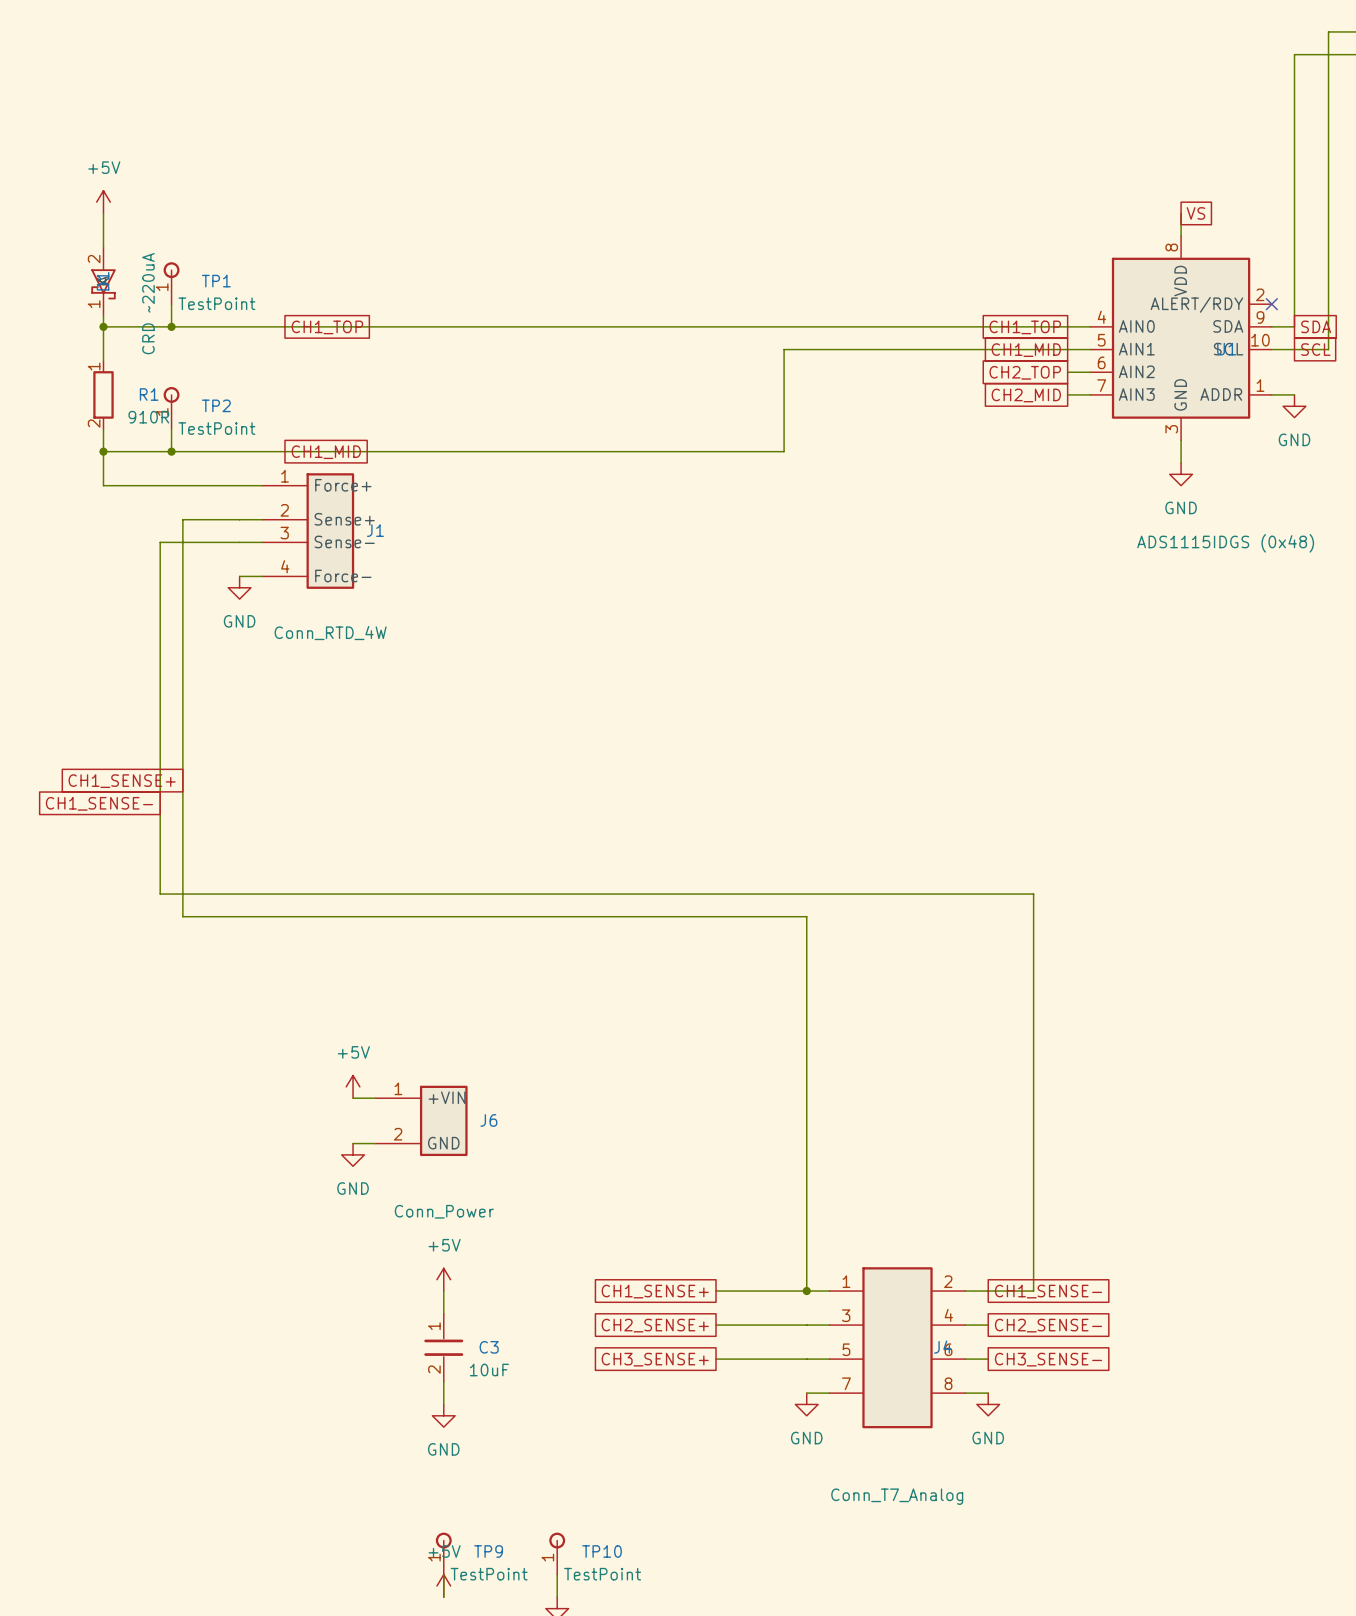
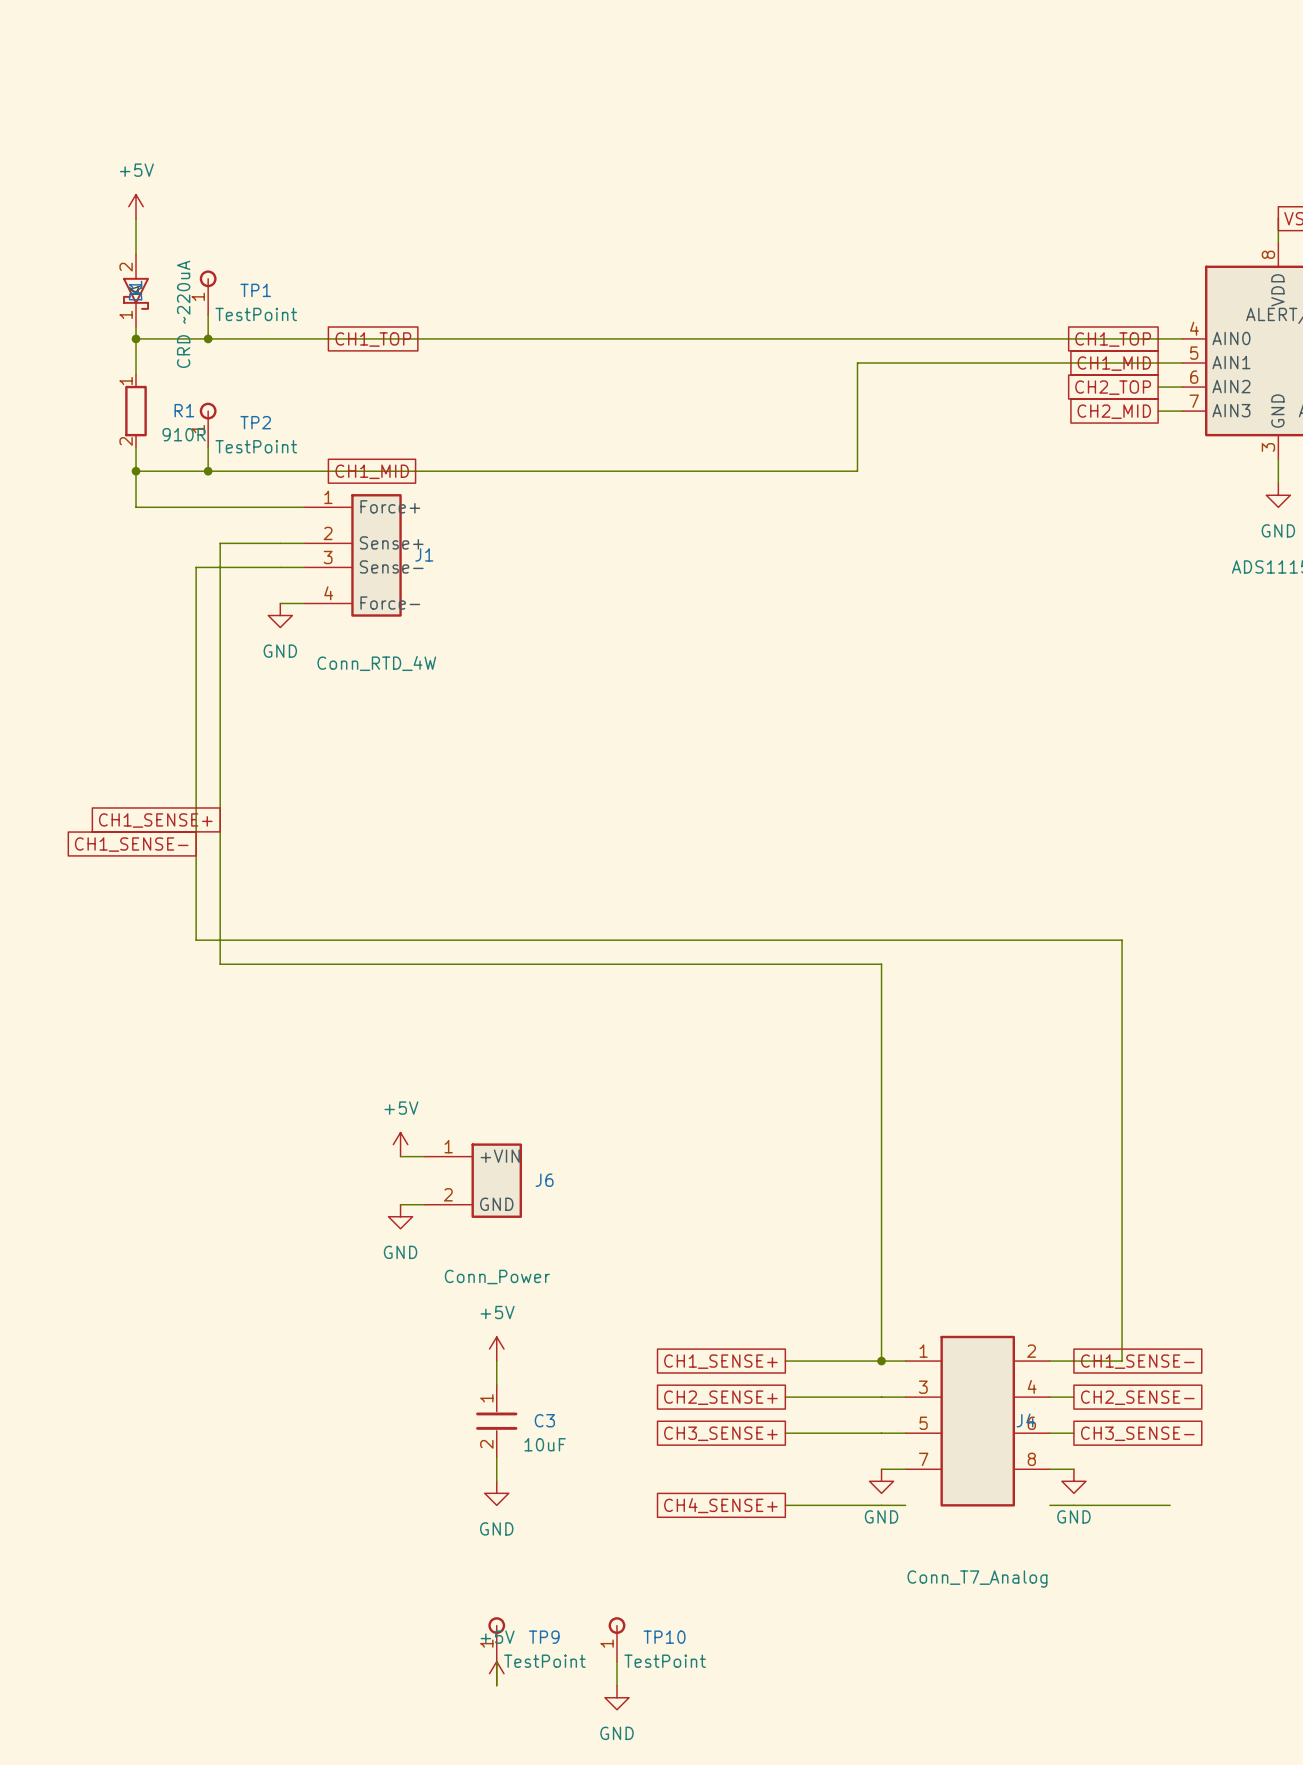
global label: none -> CH4_SENSE+ (720, 1505)
wire: none -> (785, 1505) (905, 1505)
wire: none -> (1049, 1505) (1170, 1505)

